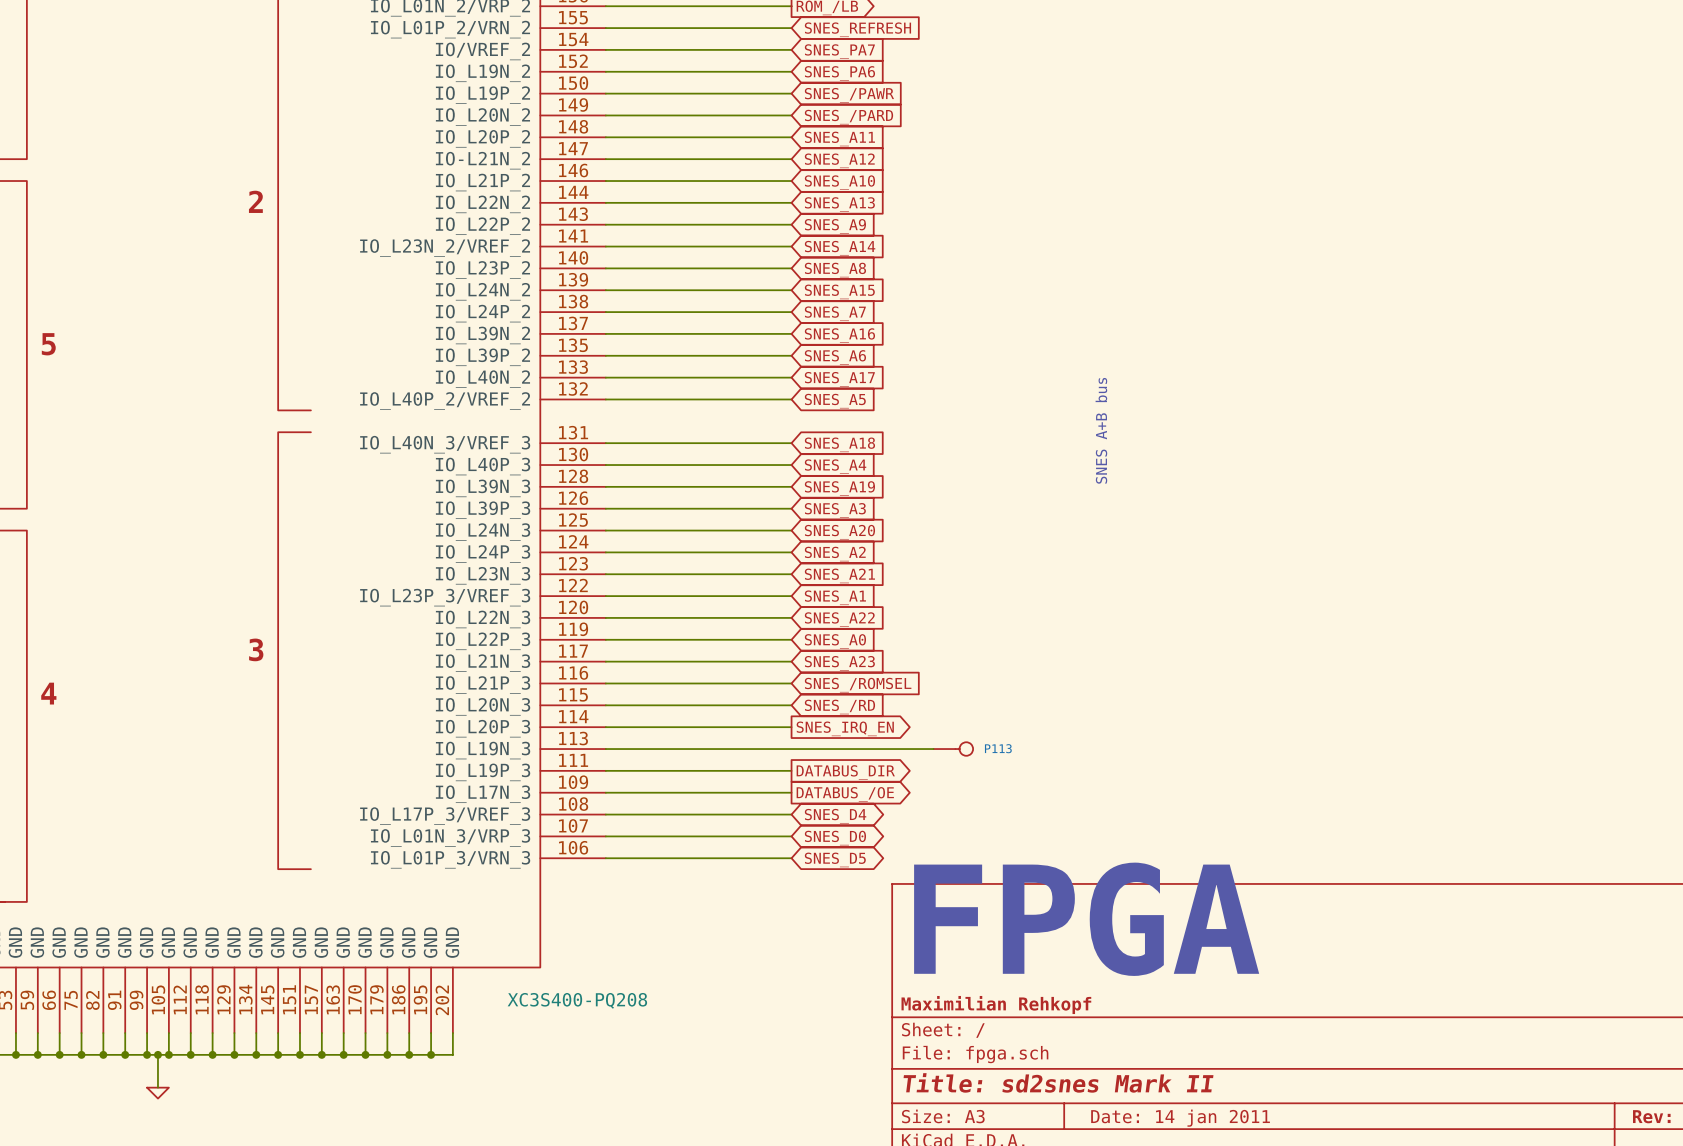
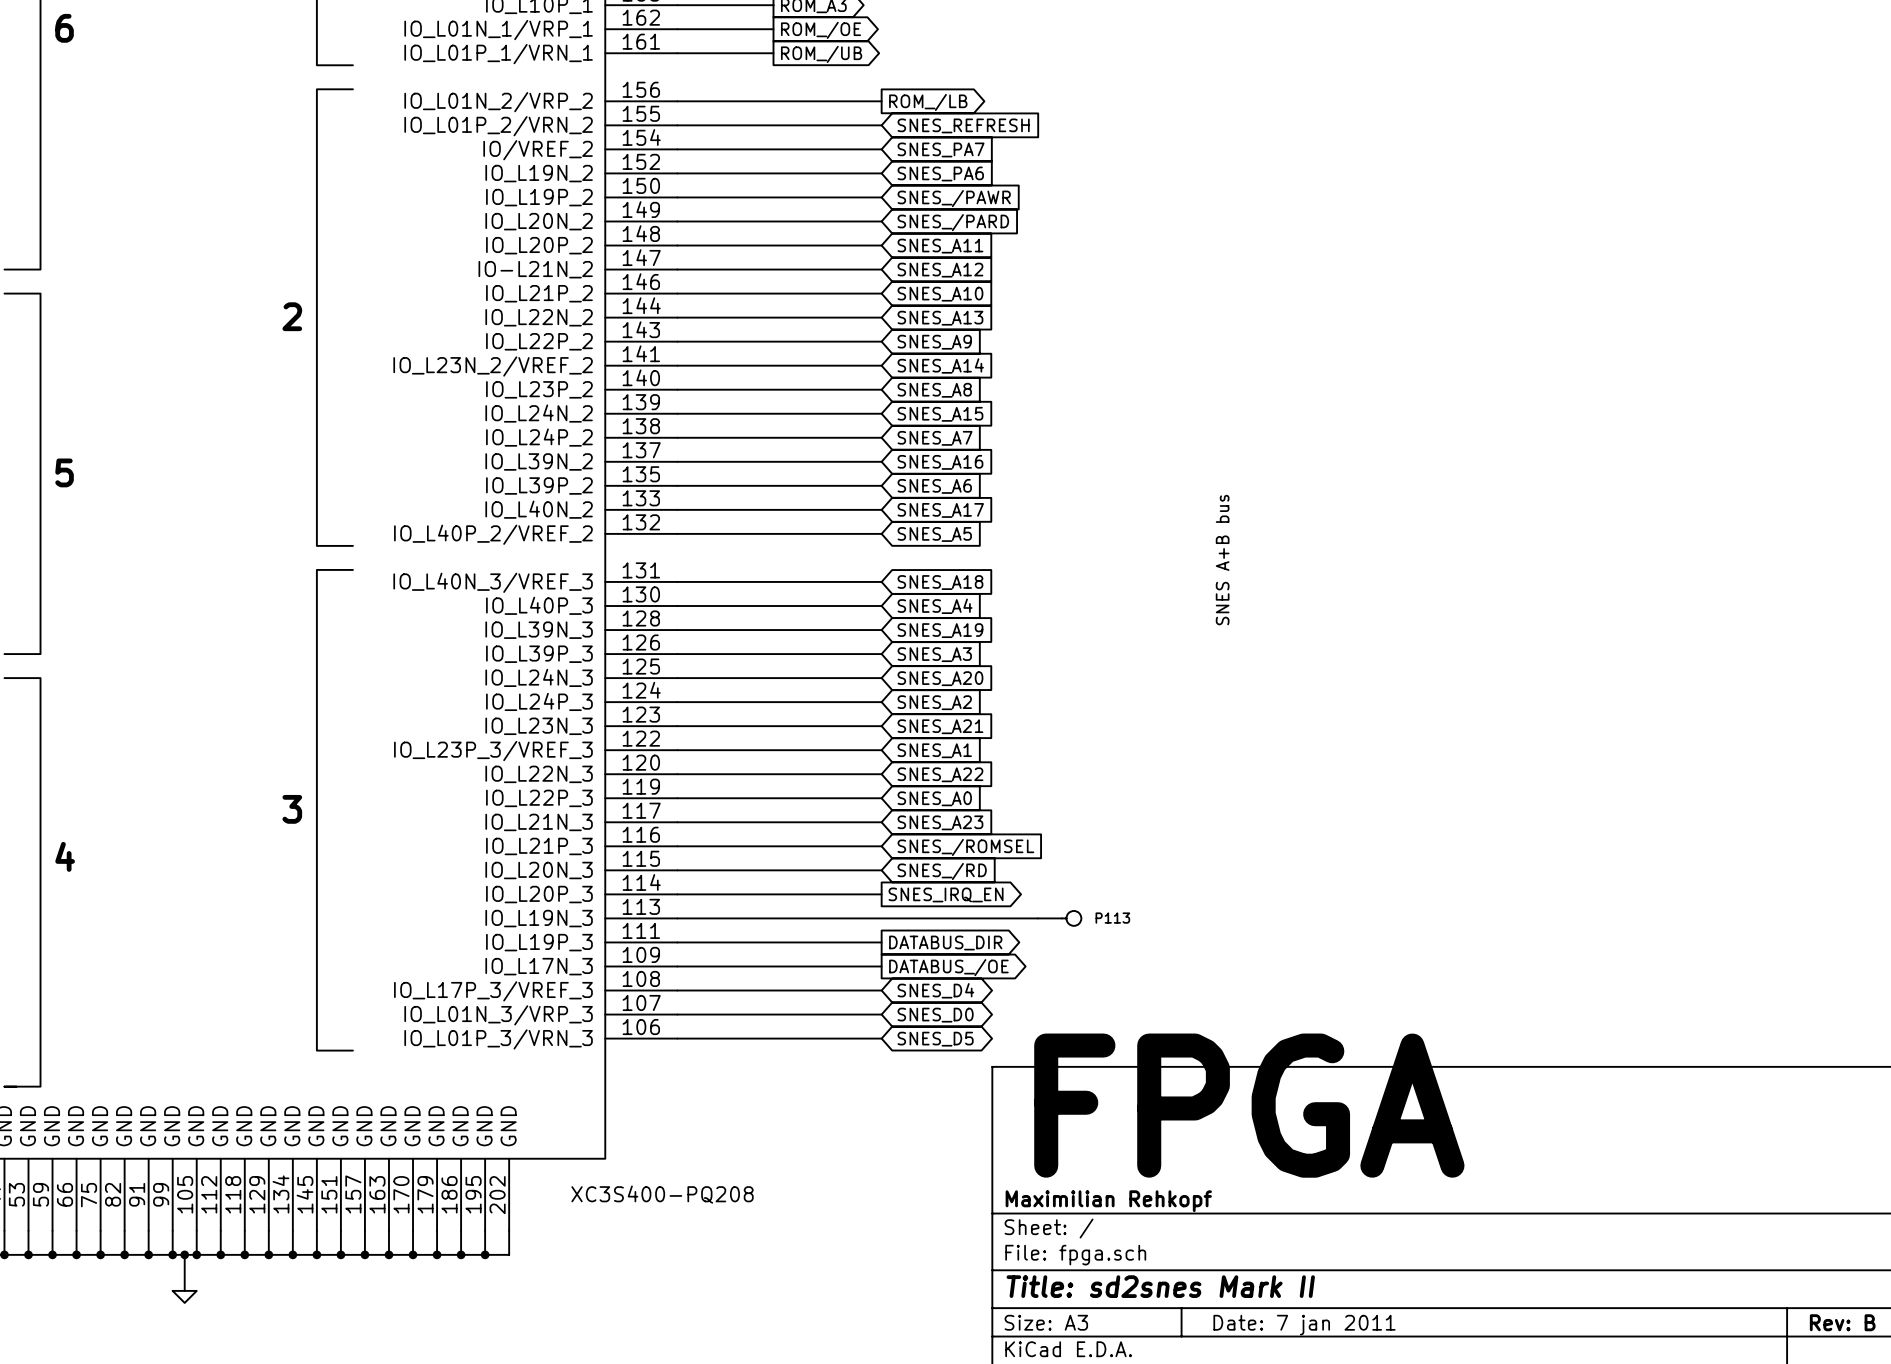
title block: Date: 14 jan 2011 (1180, 1118) -> Date: 7 jan 2011 (1304, 1325)

